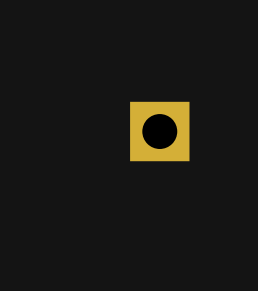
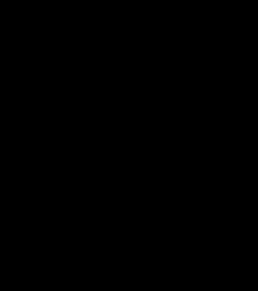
part: (159, 131) -> none

